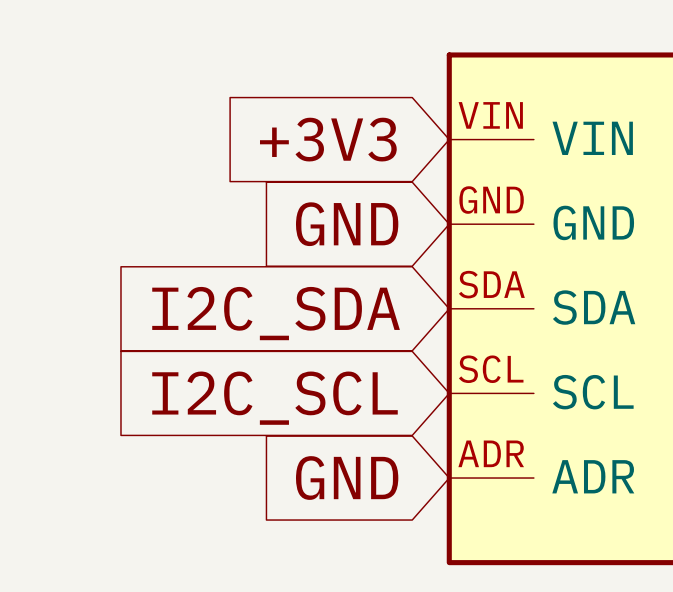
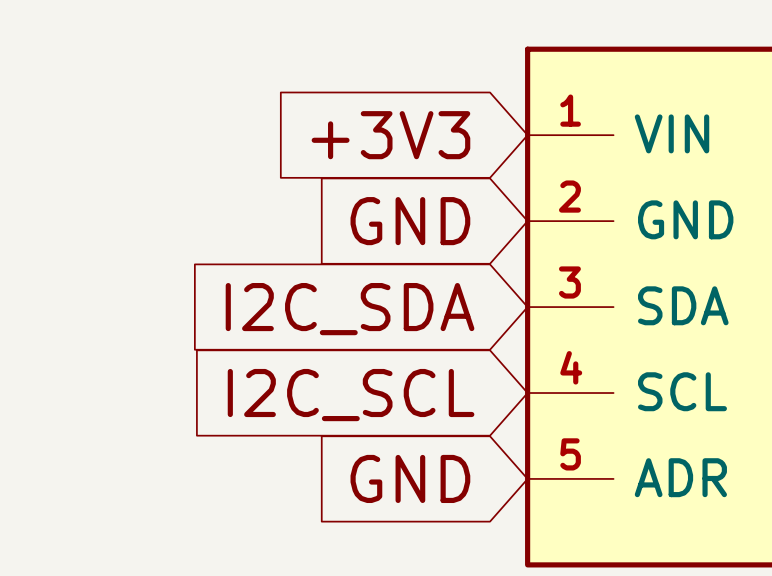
part pin number: VIN (490, 115) -> 1 (570, 110)
part pin number: GND (491, 200) -> 2 (569, 196)
part pin number: SDA (491, 284) -> 3 (569, 282)
part pin number: SCL (491, 369) -> 4 (571, 367)
part pin number: ADR (491, 453) -> 5 (570, 454)

